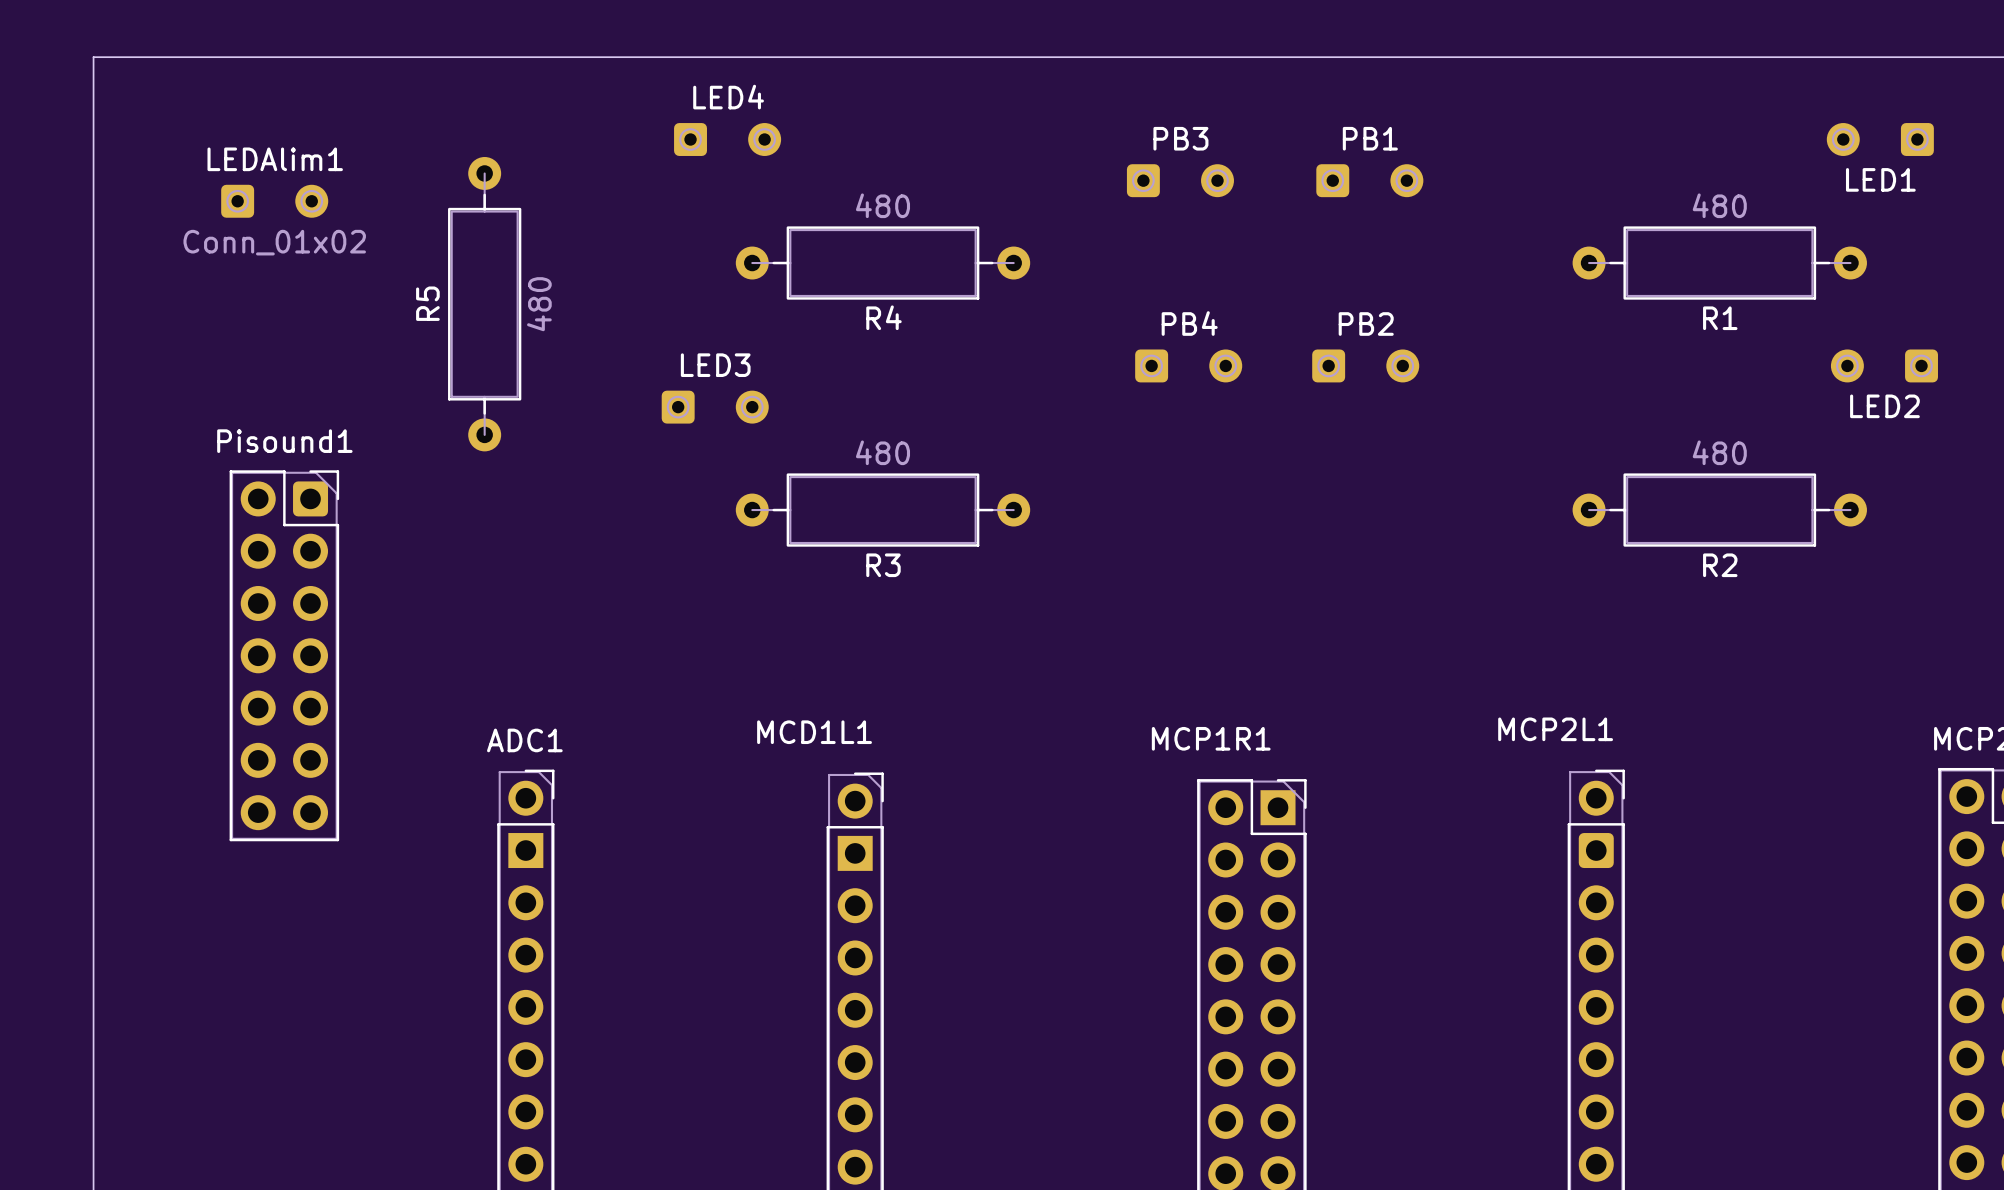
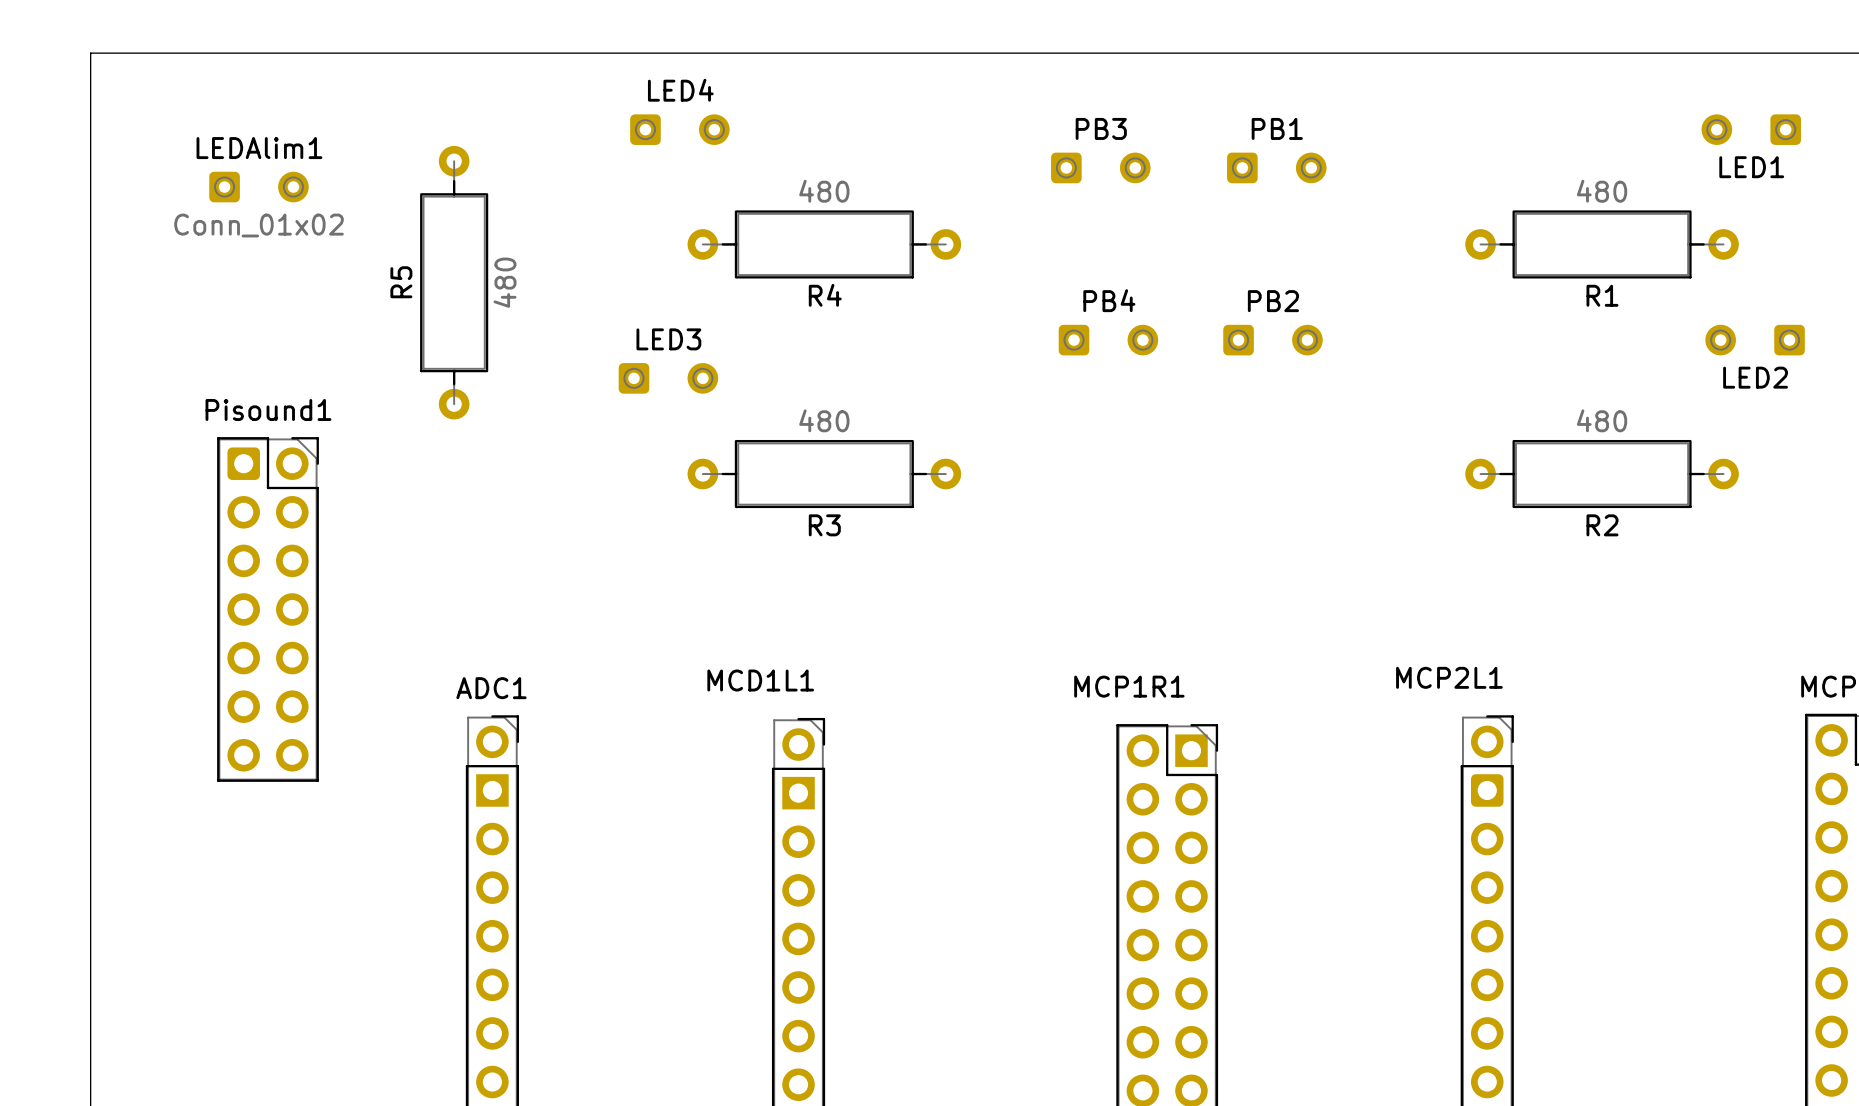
Pisound1 footprint: [229, 470, 340, 842] -> [217, 437, 319, 782]

